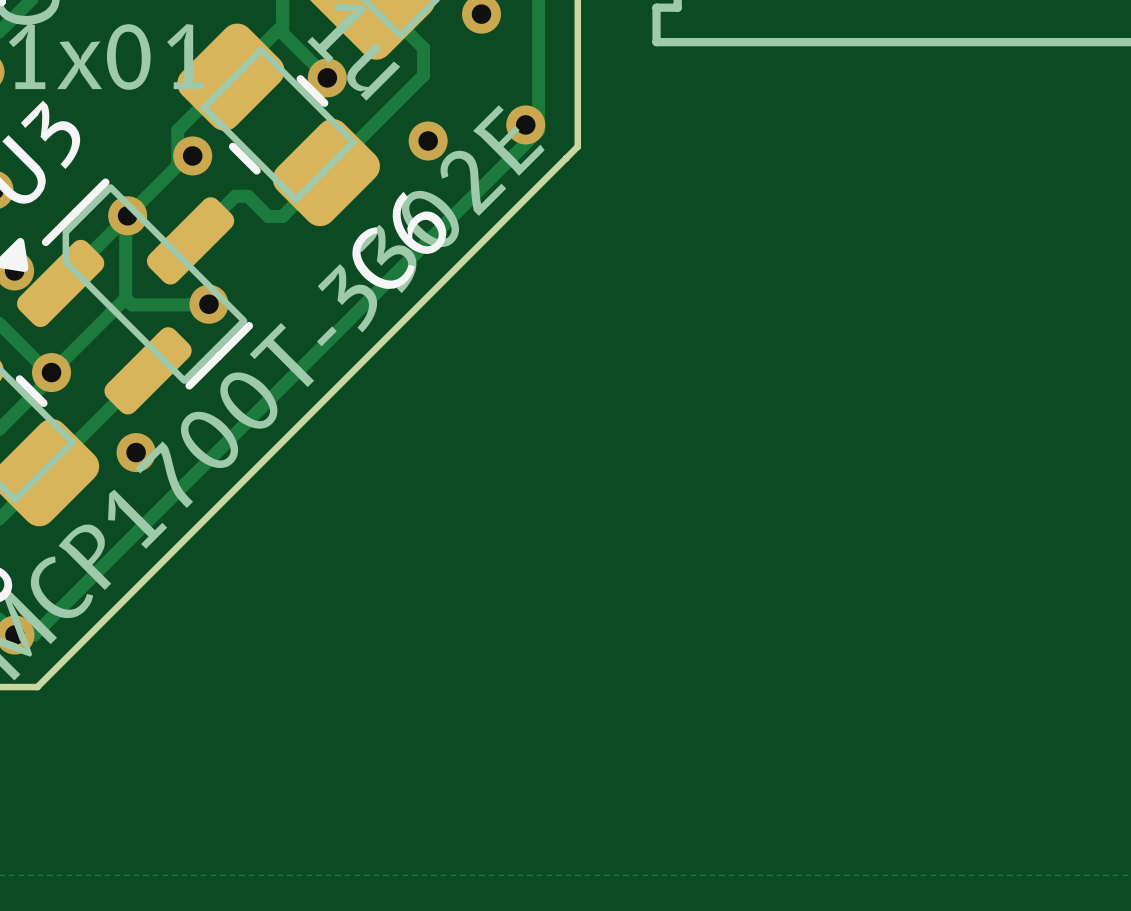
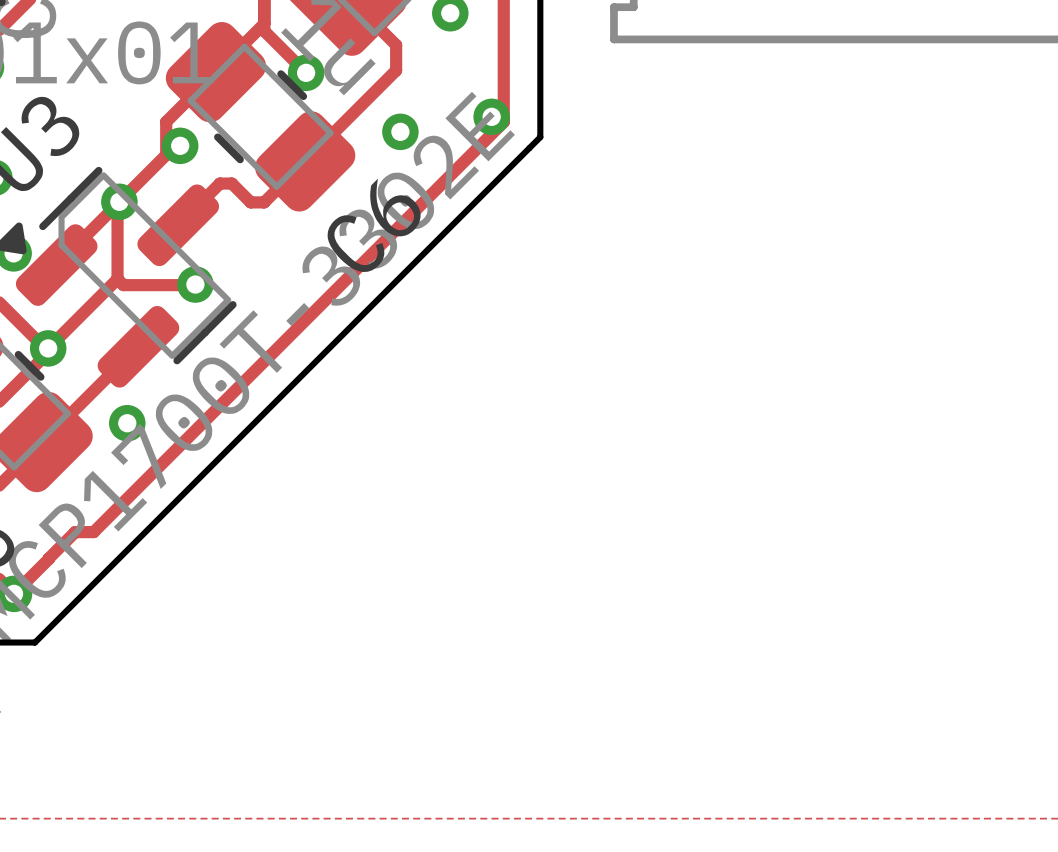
track: (100, 569) (34, 635) (14, 635) -> (93, 532) (75, 532) (48, 558)
track: none -> (48, 559) (14, 593)

